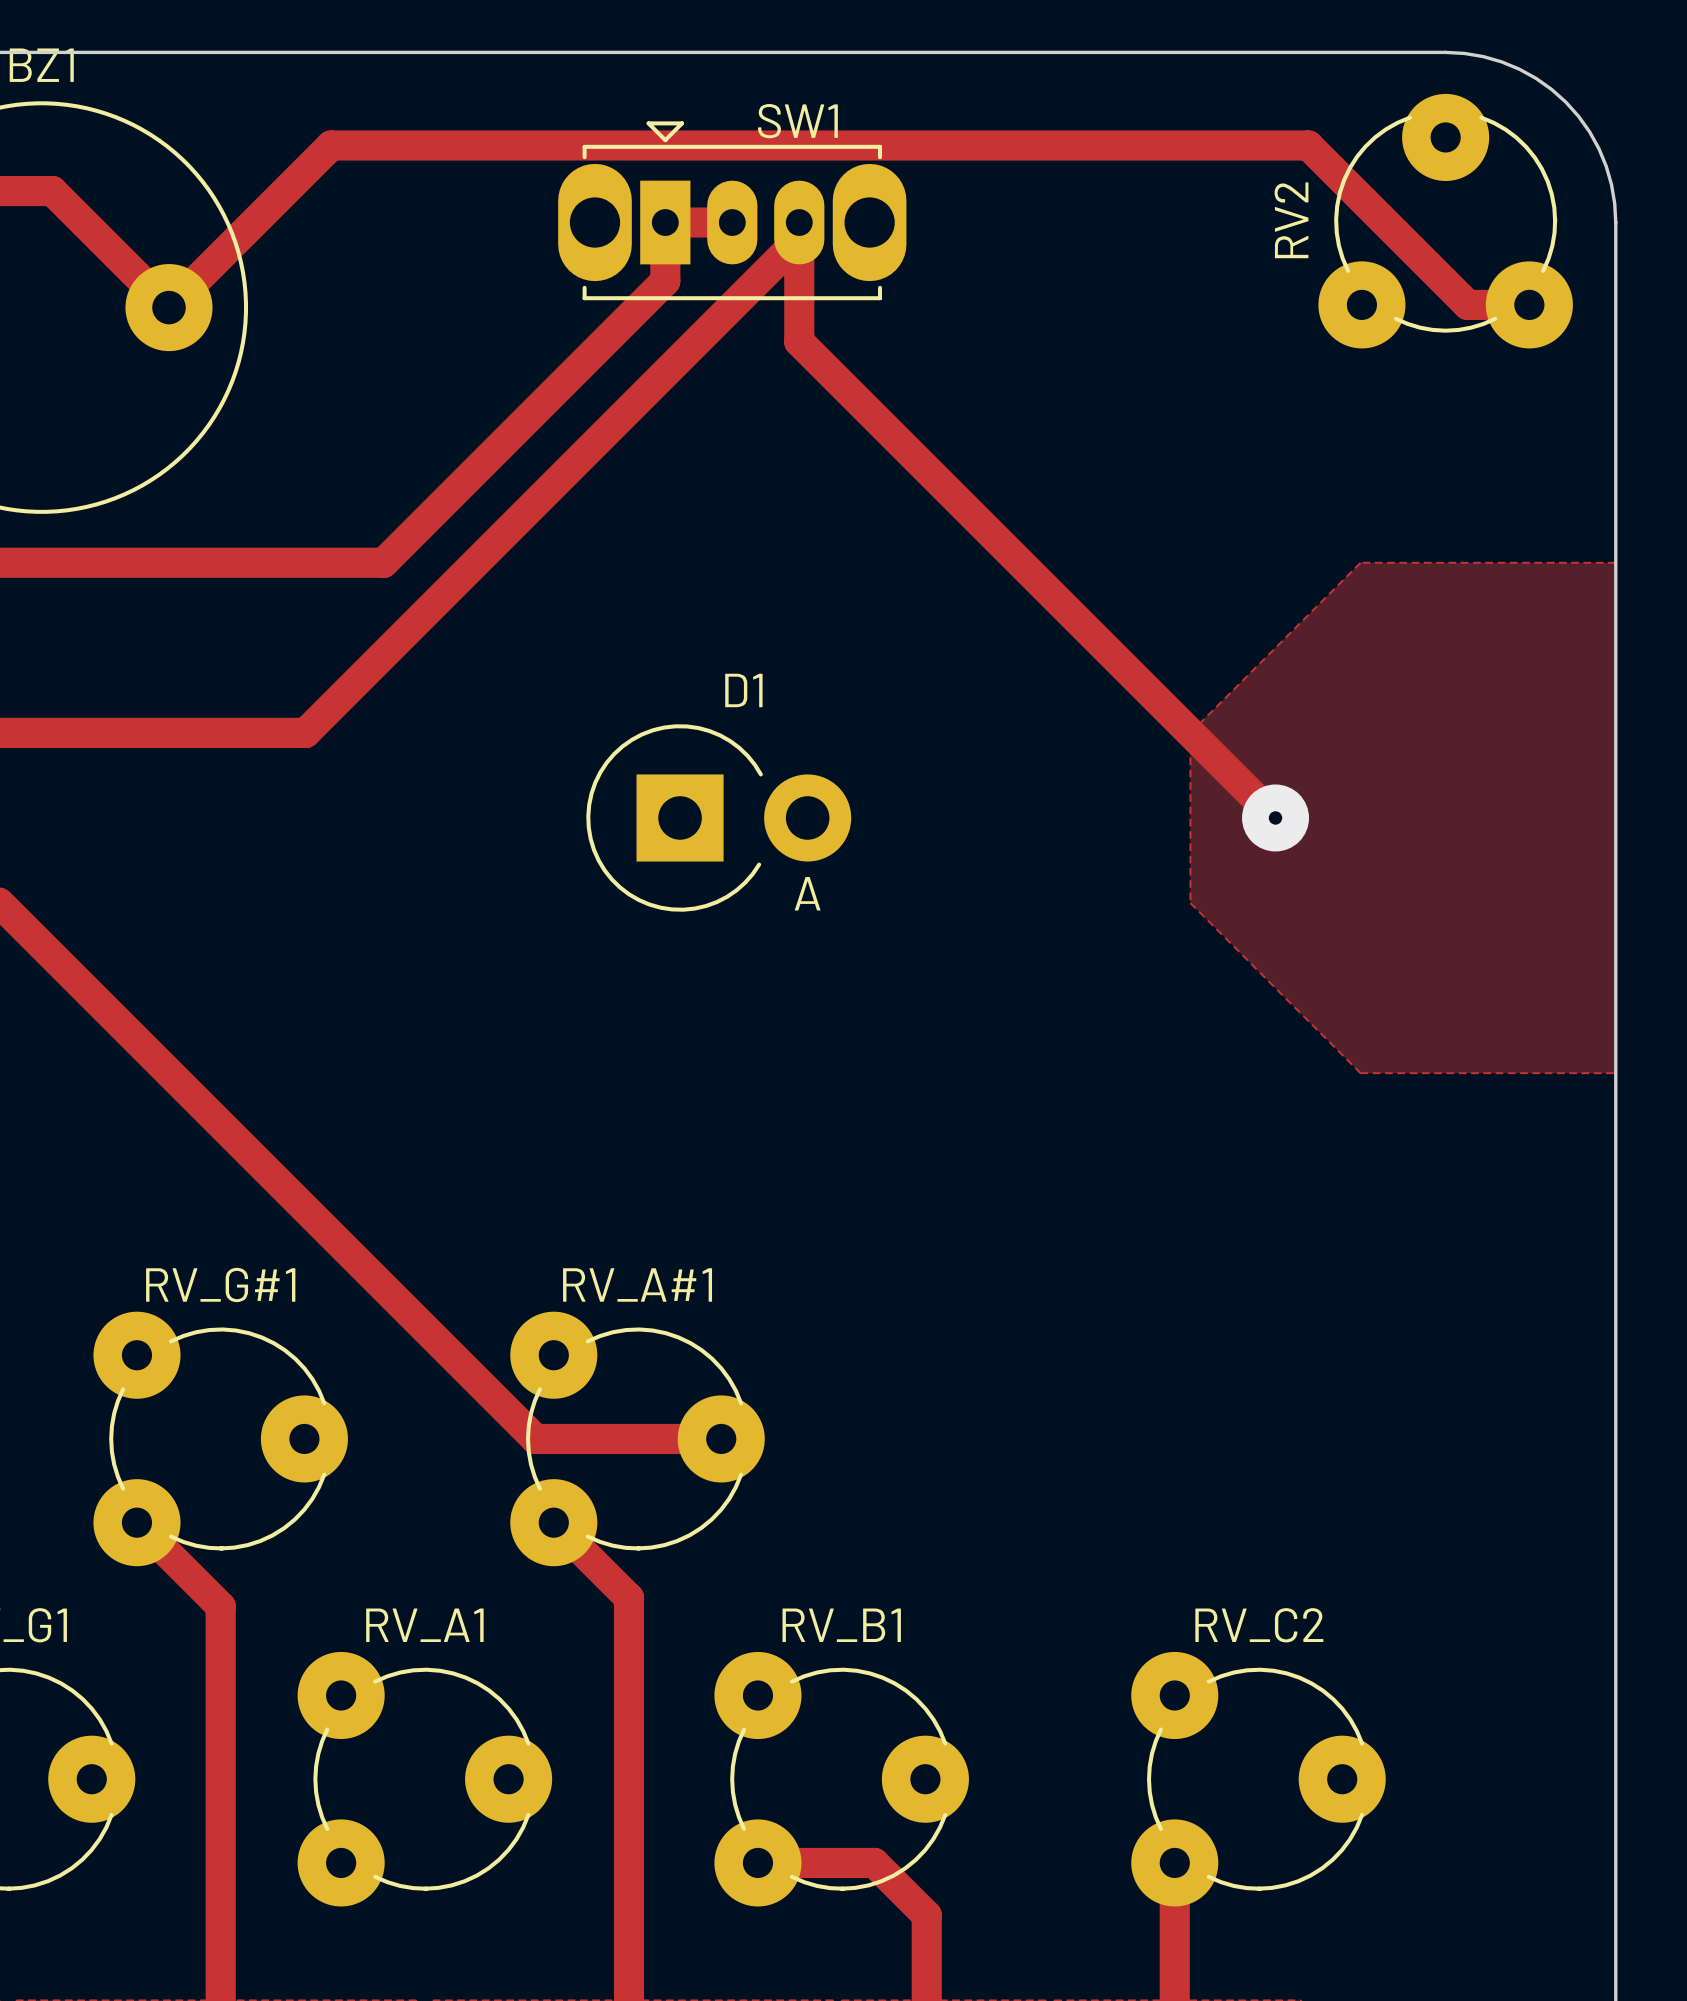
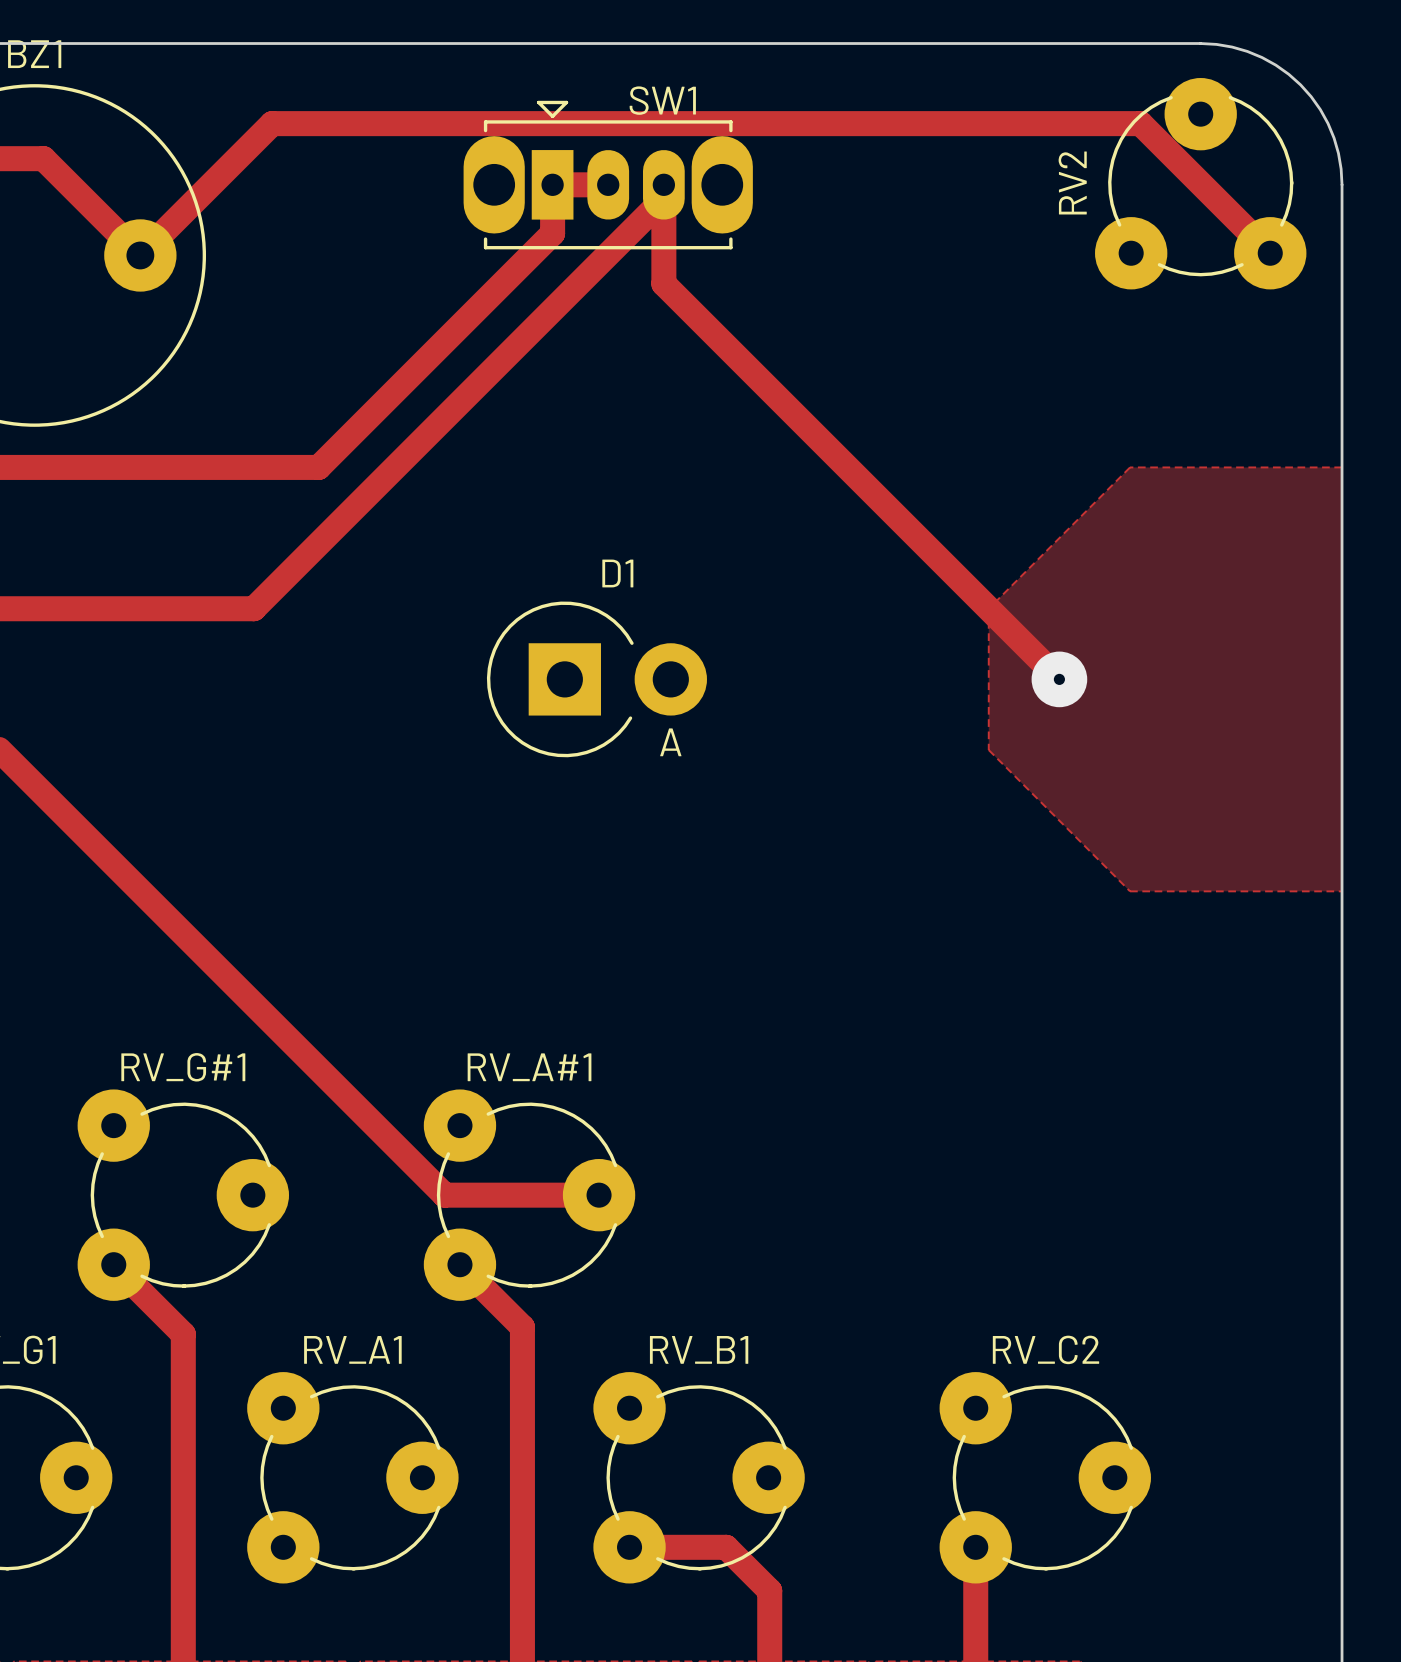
track: (327, 148) (331, 145) (1308, 145) (1467, 304) (1529, 304) -> (272, 123) (1140, 123) (1270, 253)

